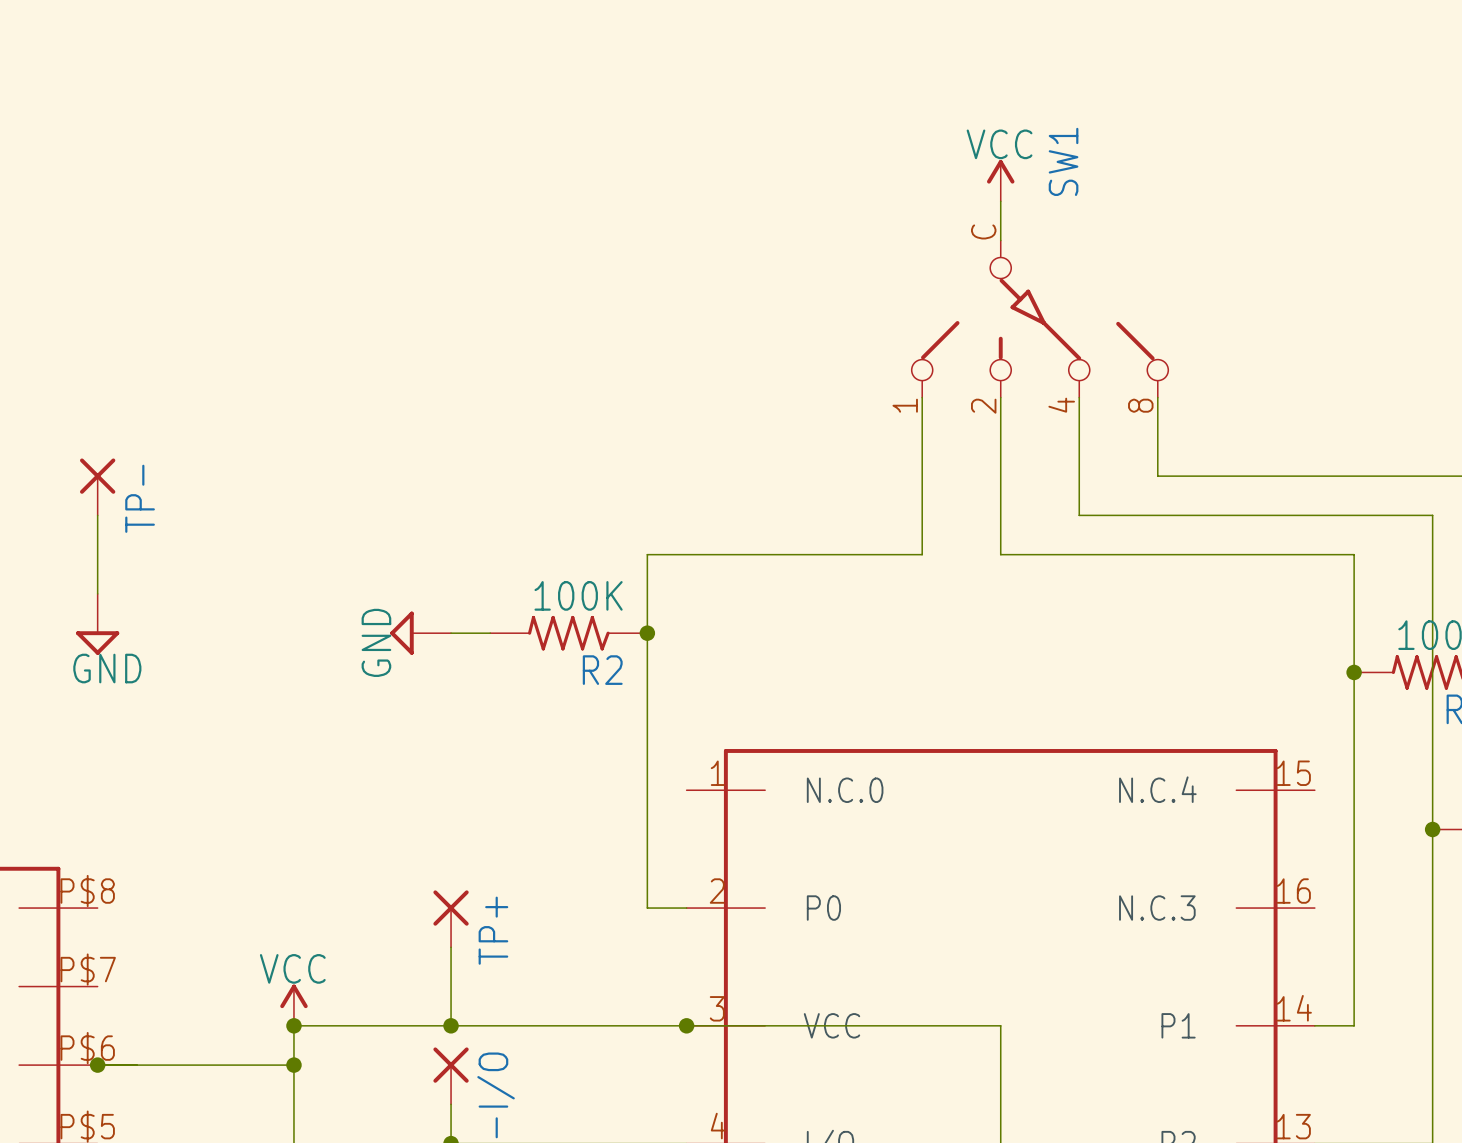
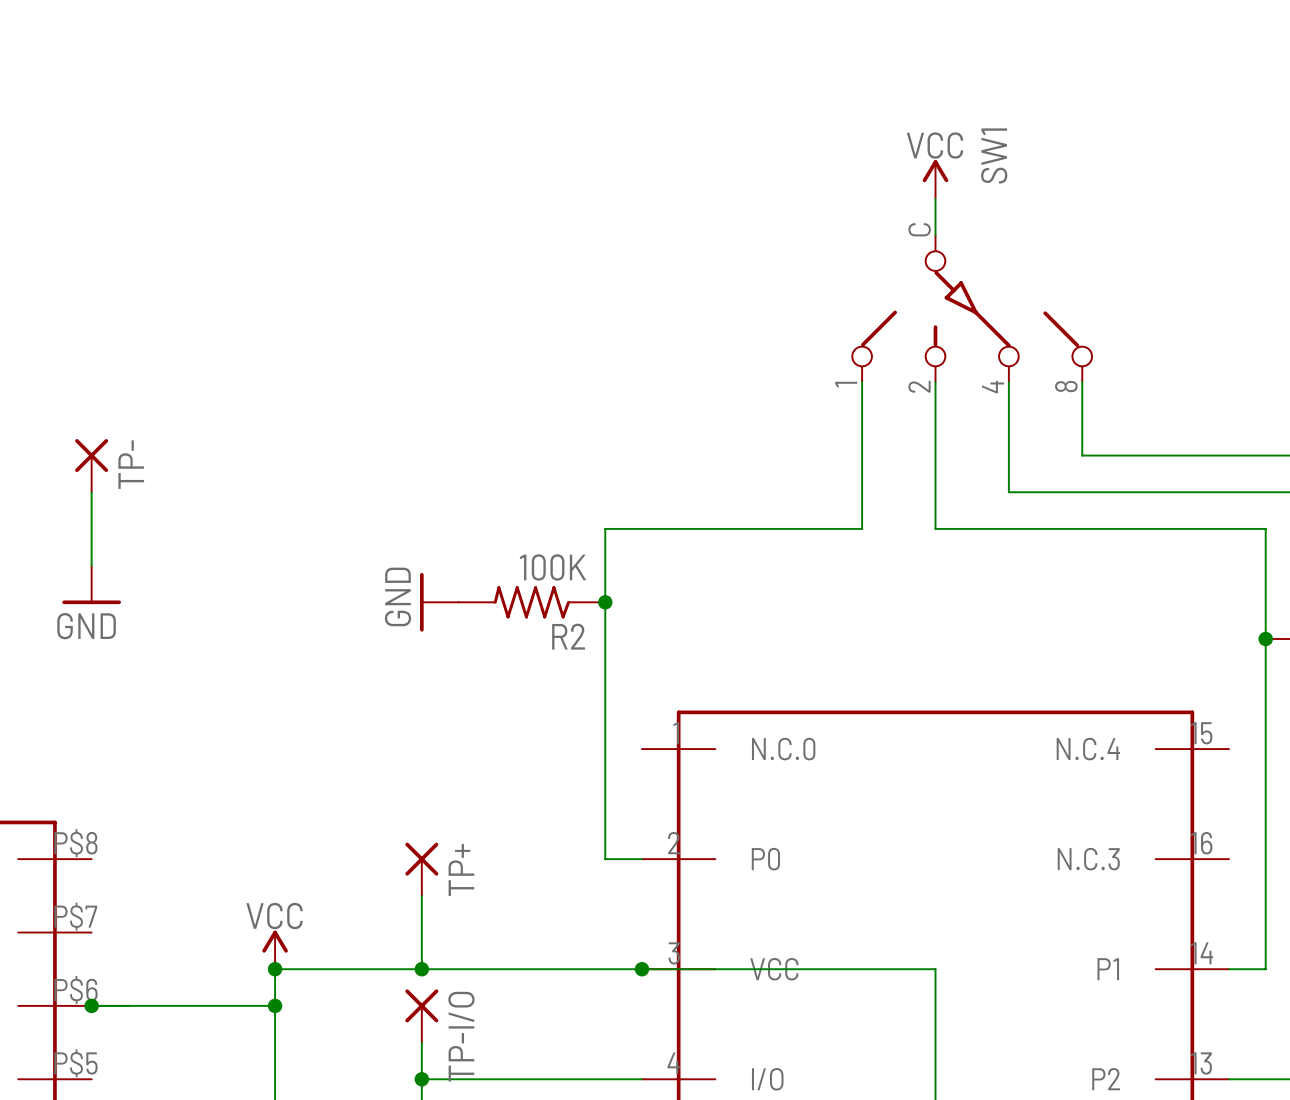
power symbol shape: [76, 593, 120, 655] -> [62, 565, 121, 605]
power symbol: GND (420, 633) -> none
power symbol: none -> GND (439, 602)

